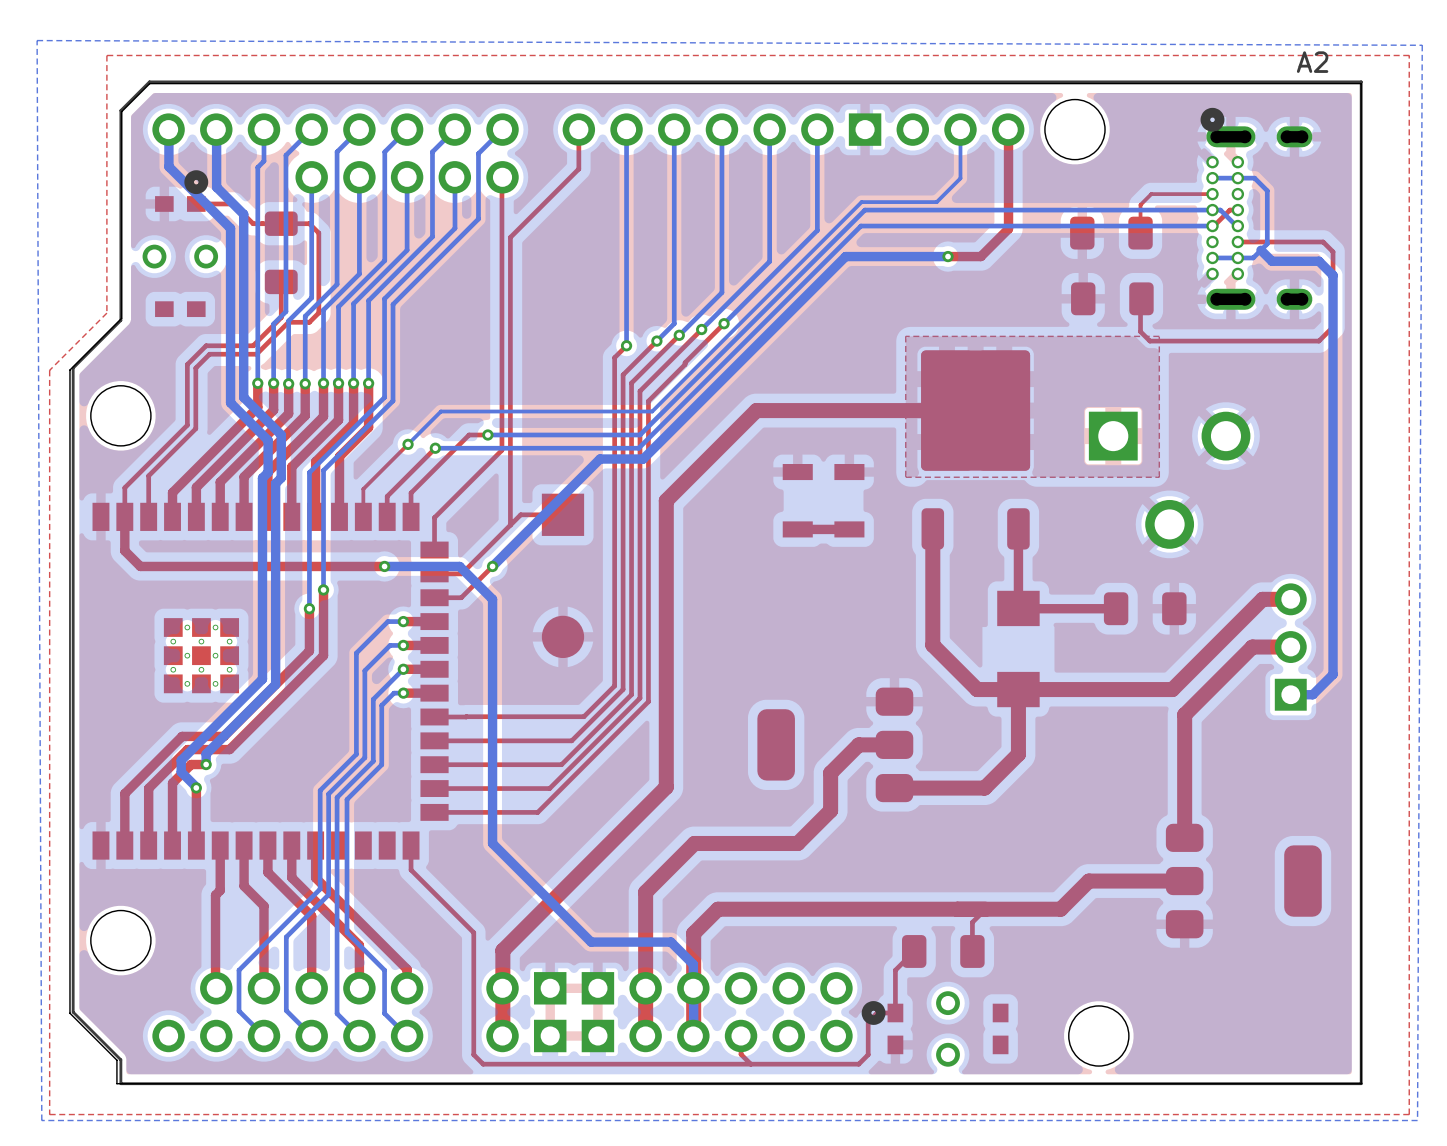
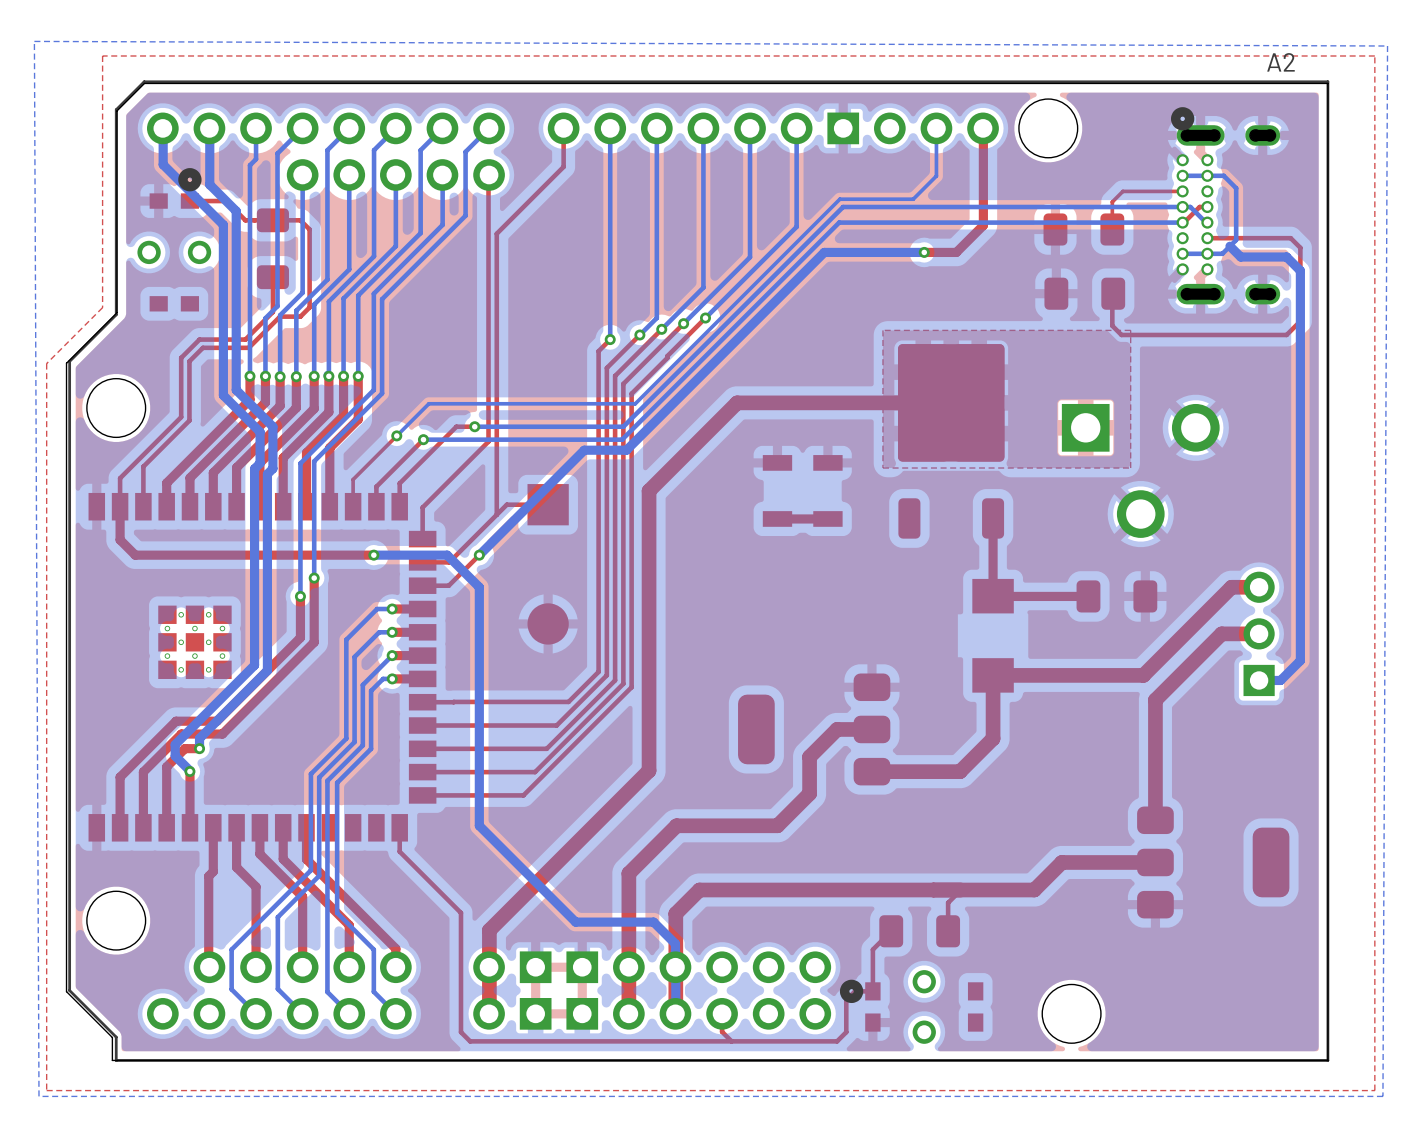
top track: (932, 528) (932, 645) (977, 689) (1018, 689) -> none

